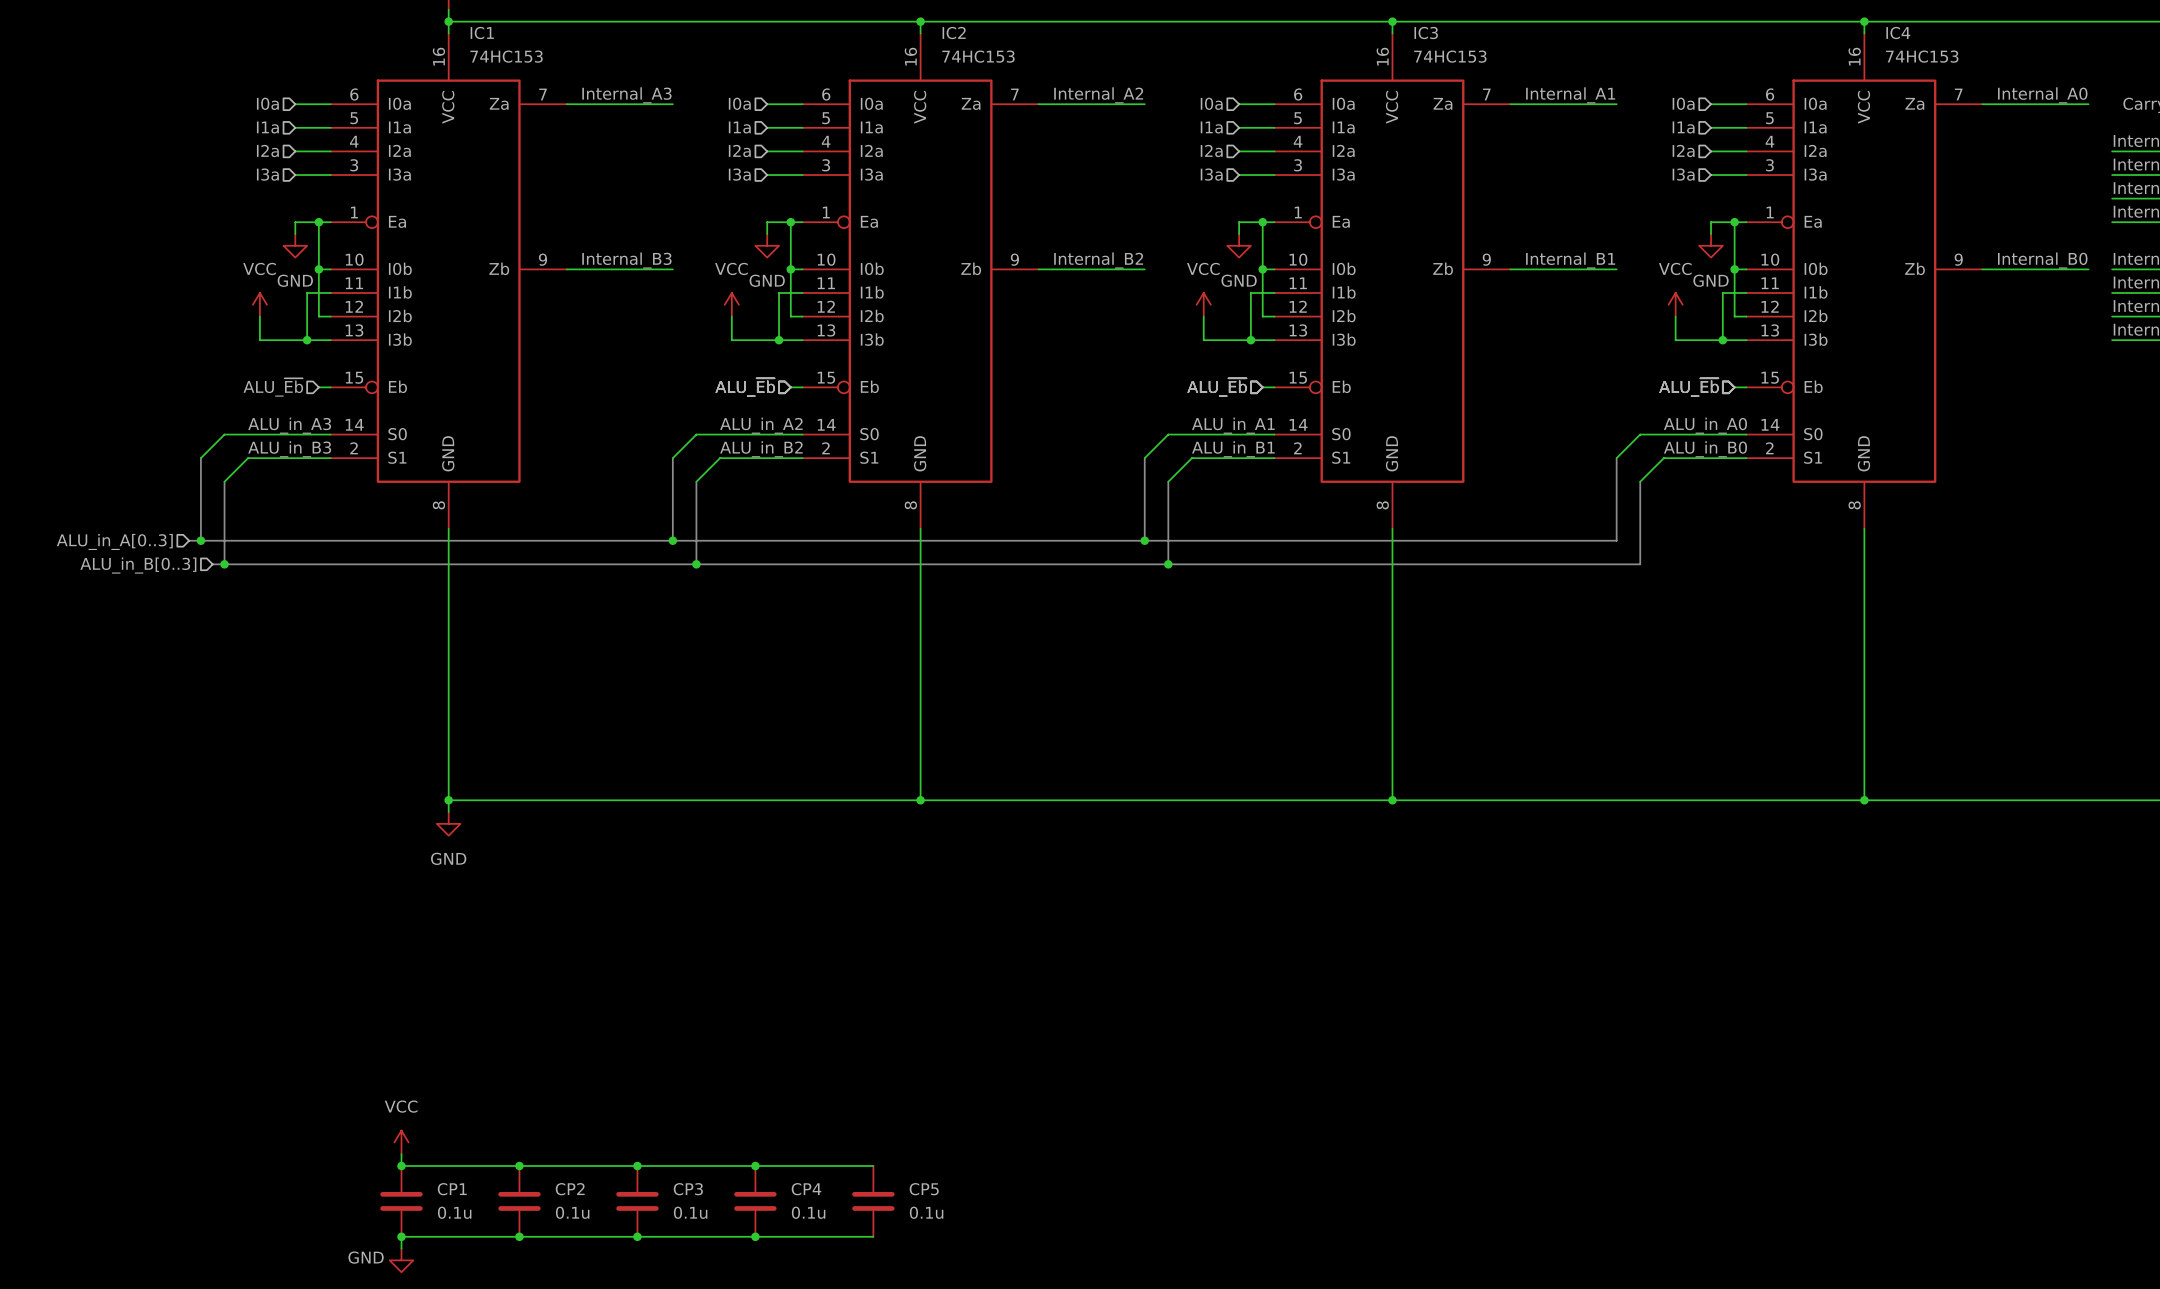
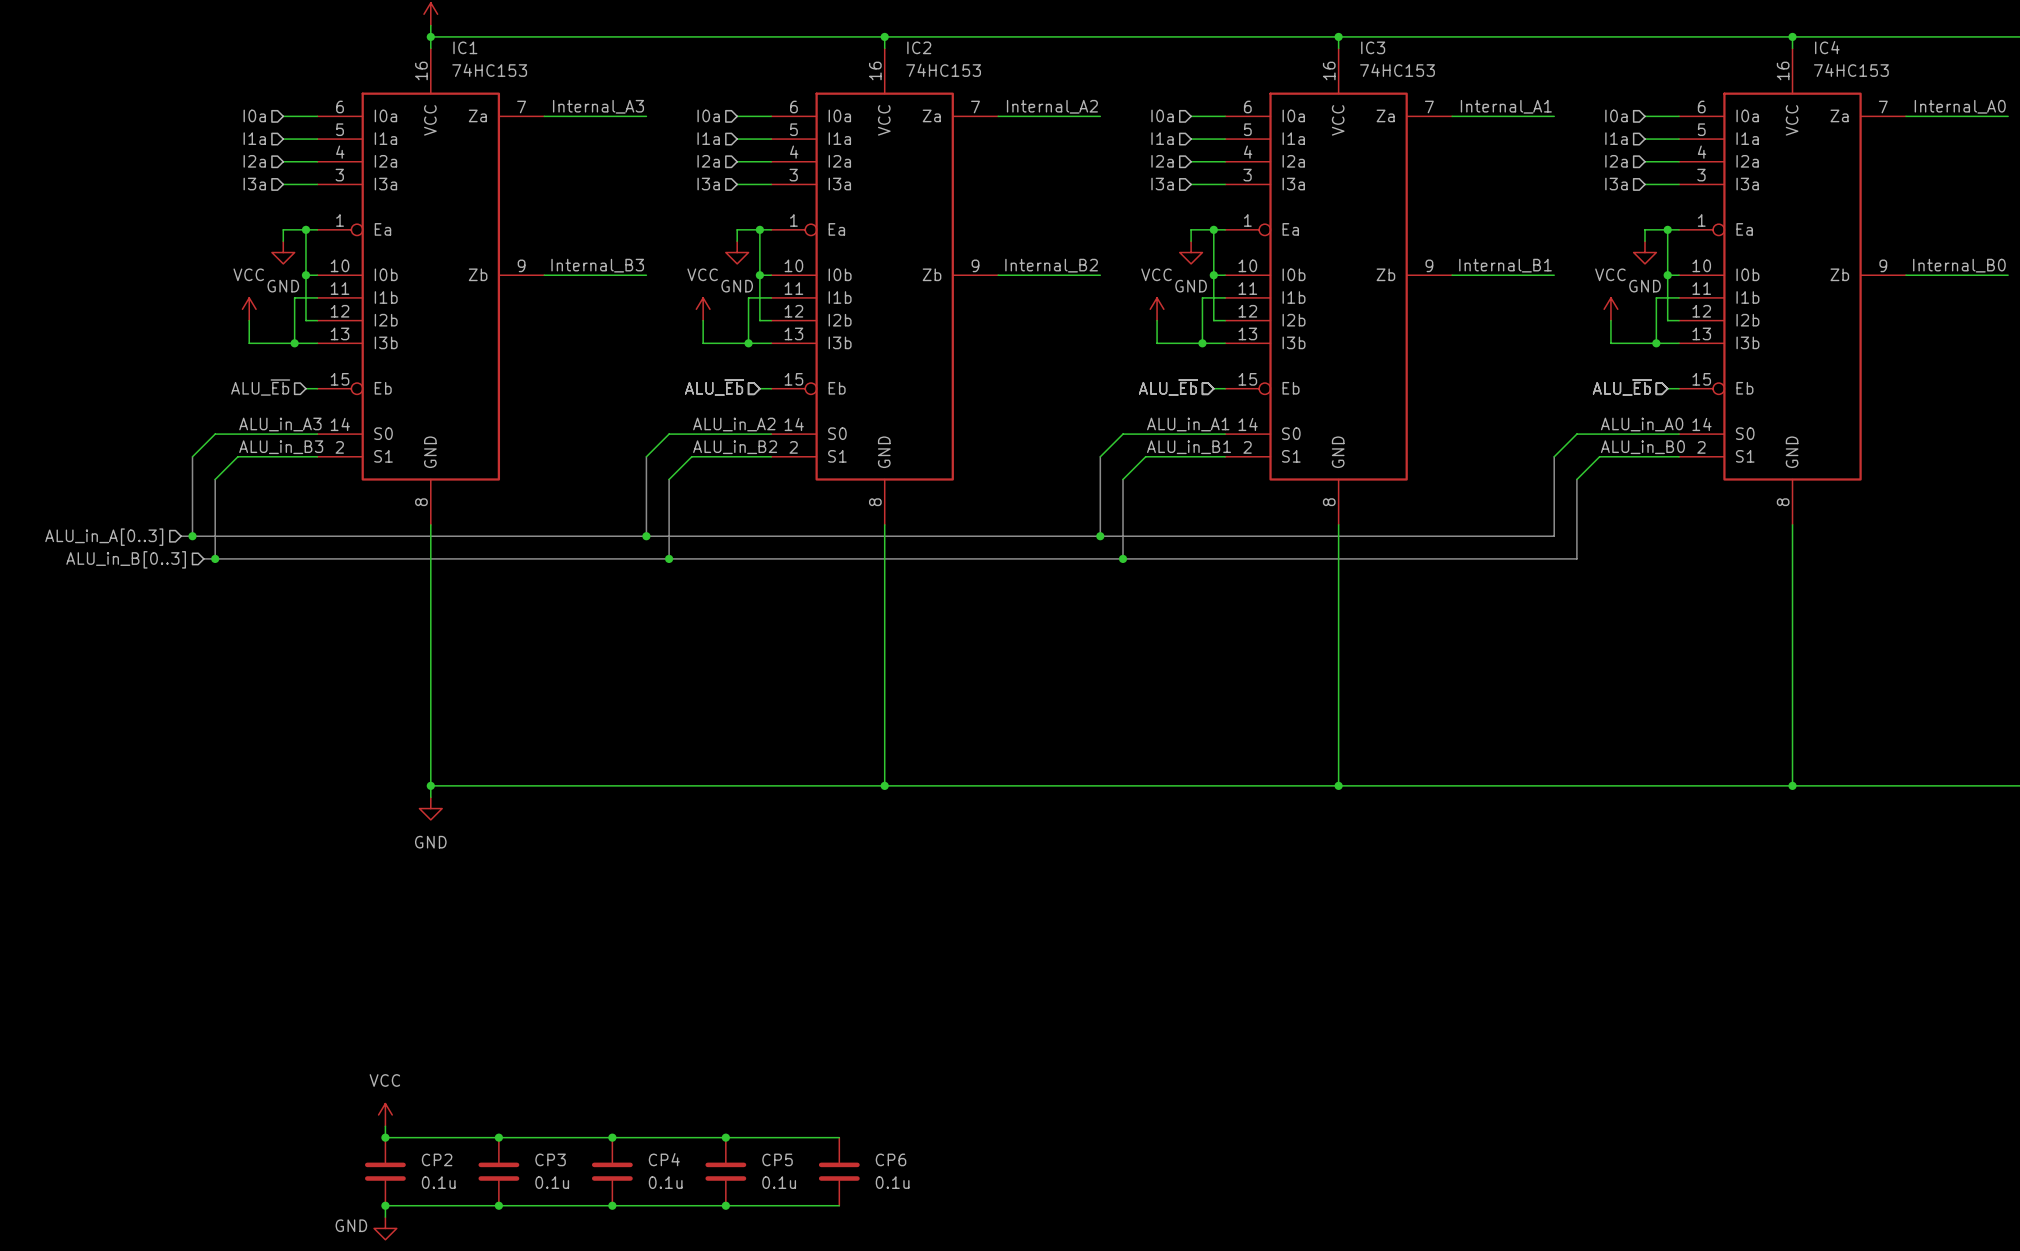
CP1 name: CP1 (452, 1189) -> CP2 (437, 1159)
CP2 name: CP2 (570, 1189) -> CP3 (550, 1159)
CP3 name: CP3 (688, 1189) -> CP4 (664, 1159)
CP4 name: CP4 (806, 1189) -> CP5 (777, 1159)
CP5 name: CP5 (924, 1189) -> CP6 (891, 1159)

